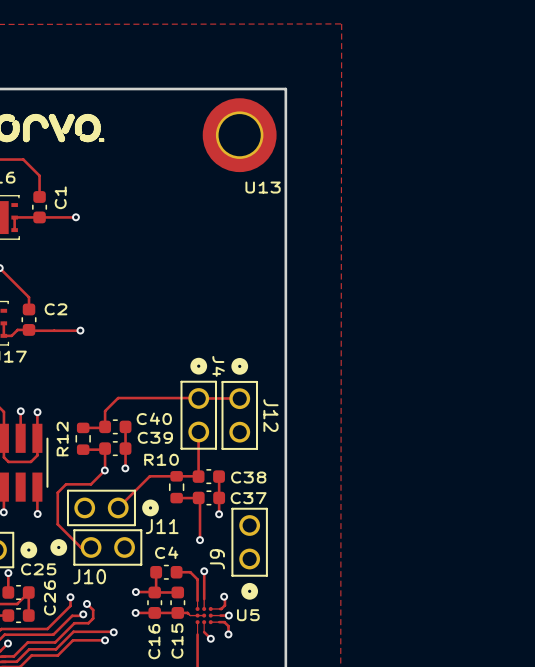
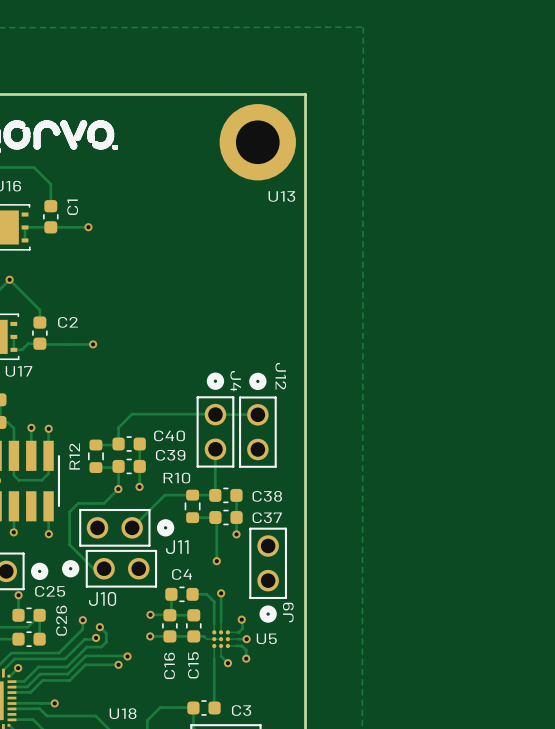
J12 name position: J12 (270, 415) -> J12 (280, 376)
J9 name position: J9 (217, 559) -> J9 (288, 612)

